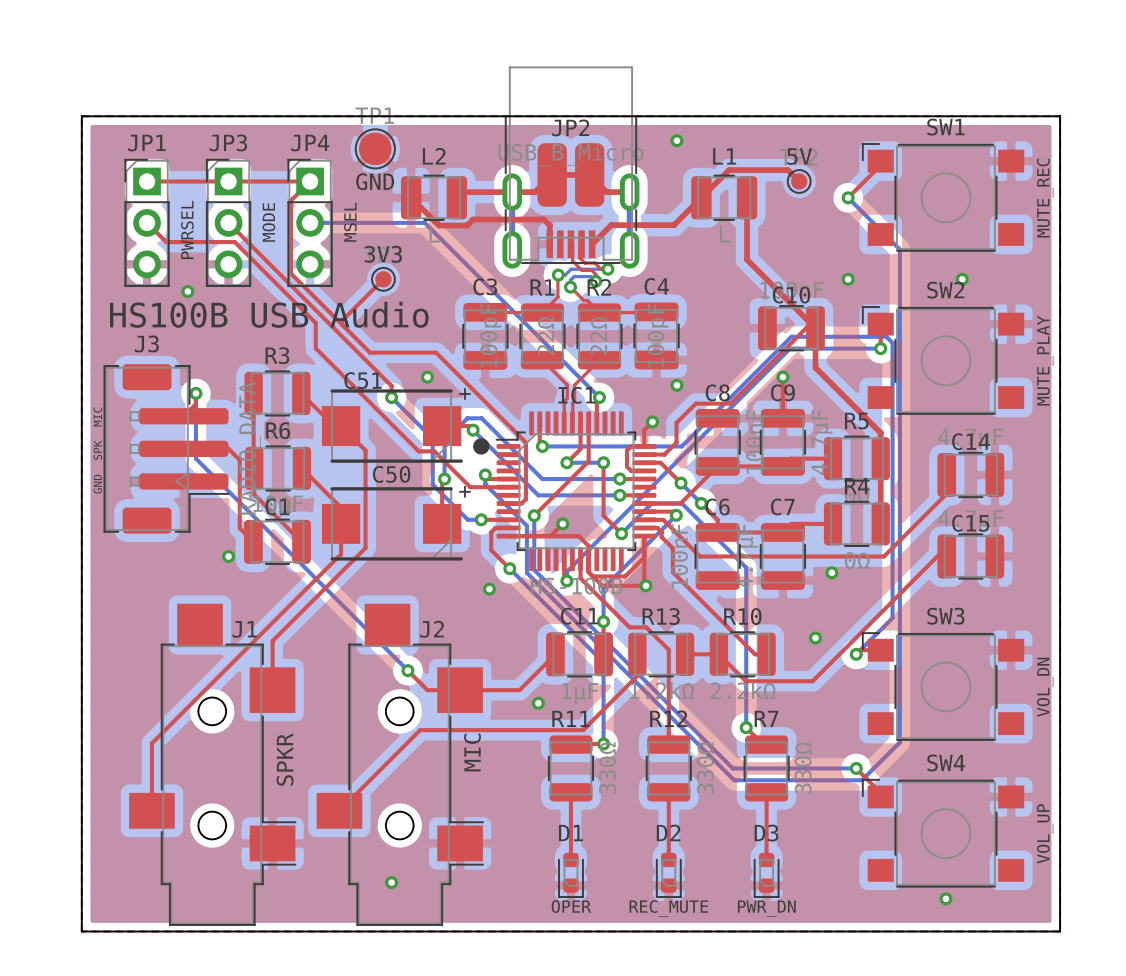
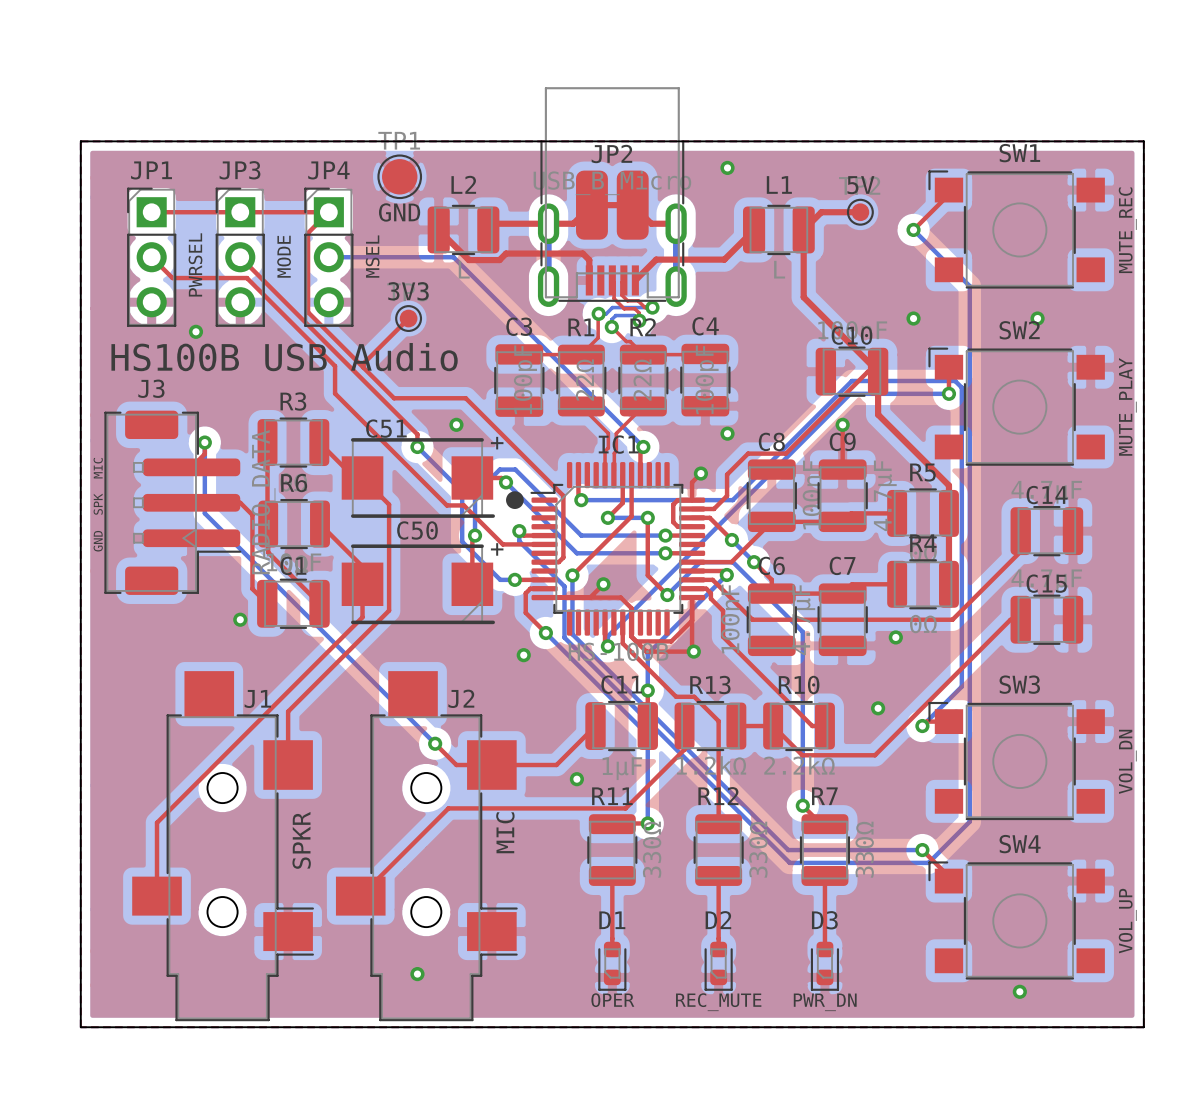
top track: (799, 181) (787, 170) (729, 170) (701, 197) -> (860, 212) (821, 212) (803, 229)

